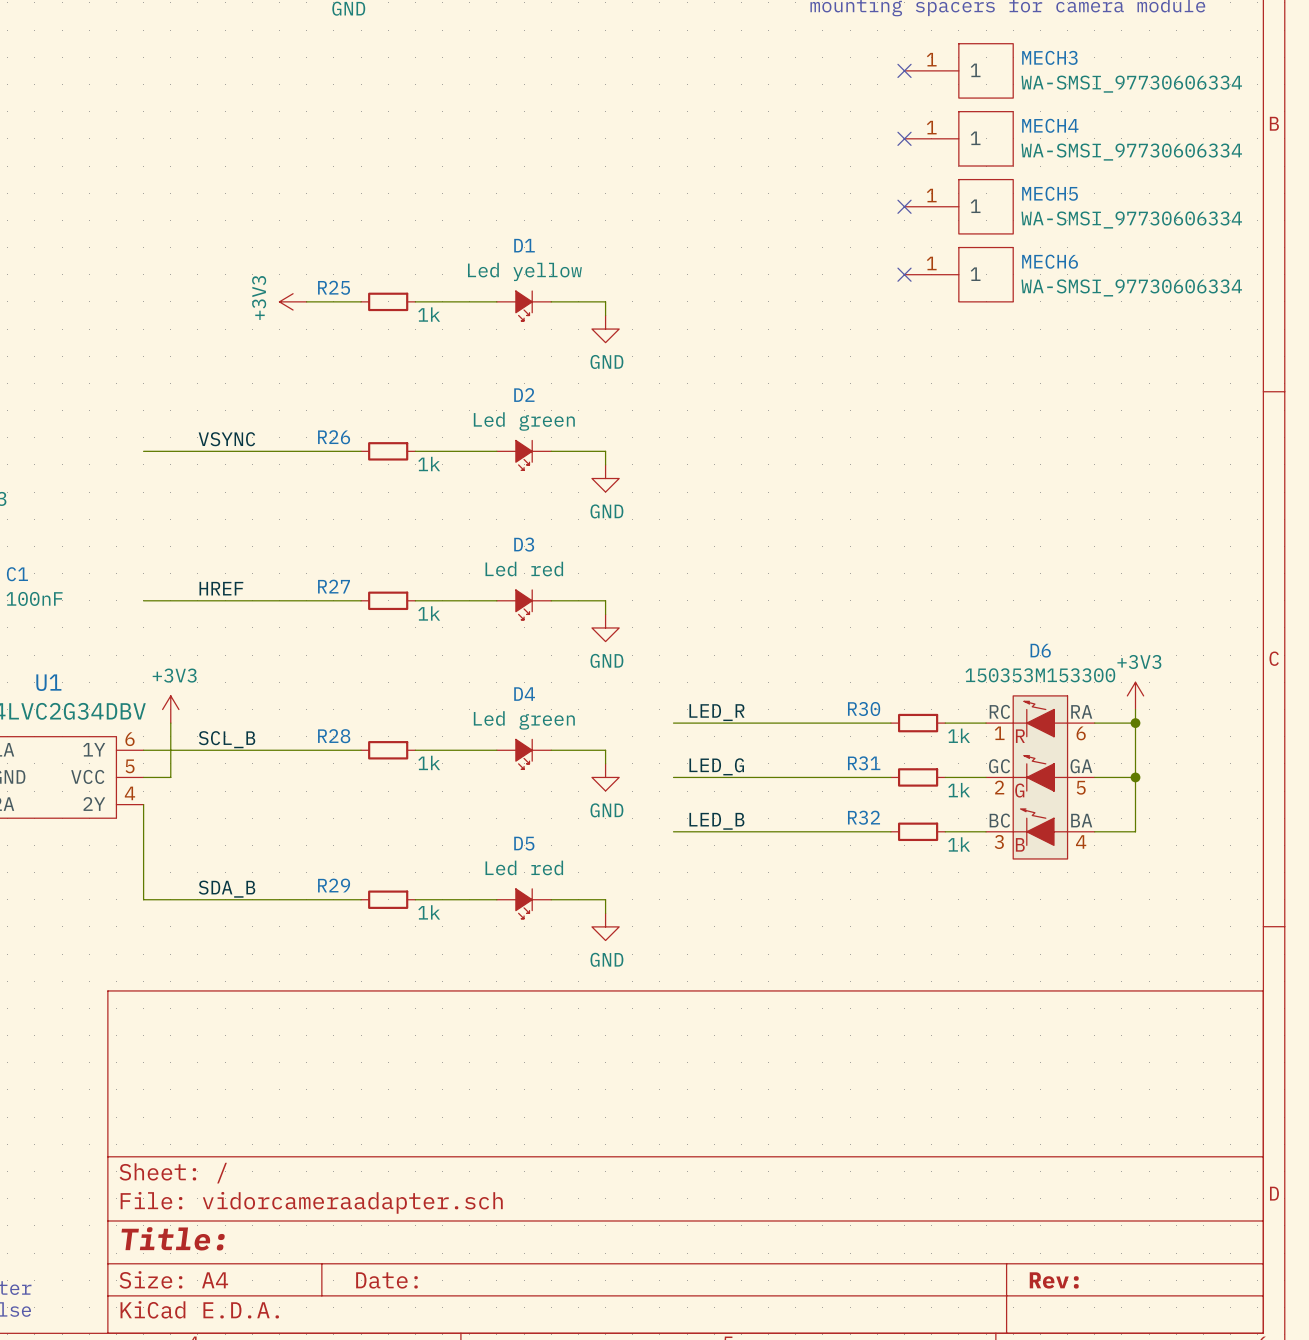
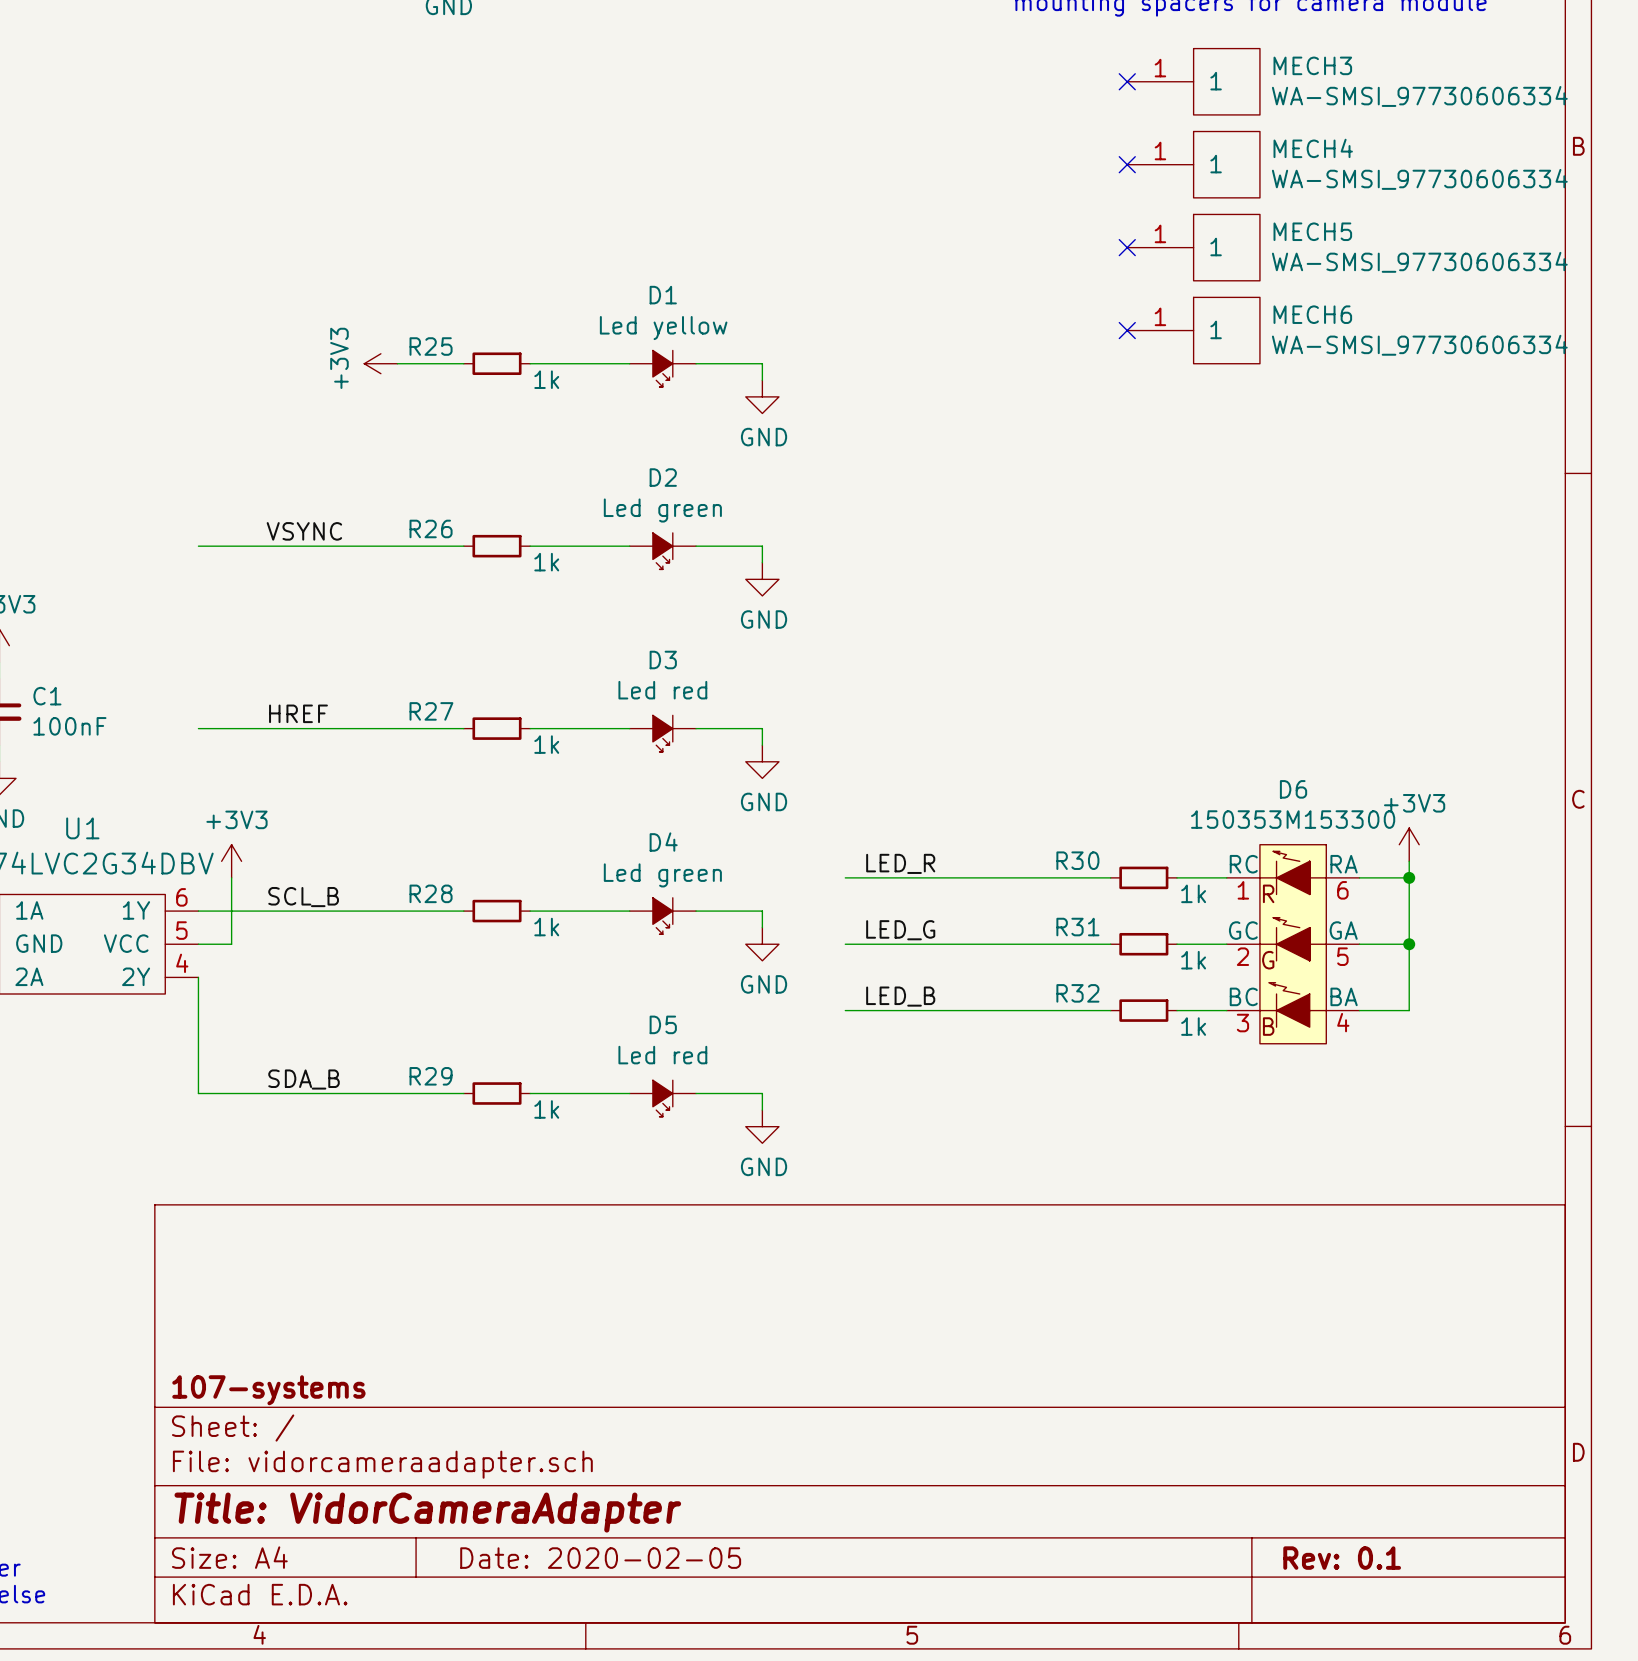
title block: none -> 107-systems (268, 1390)
title block: Title: (173, 1238) -> Title: VidorCameraAdapter (427, 1512)
title block: Date: (386, 1280) -> Date: 2020-02-05 (600, 1558)
title block: Rev: (1054, 1280) -> Rev: 0.1 (1342, 1558)

